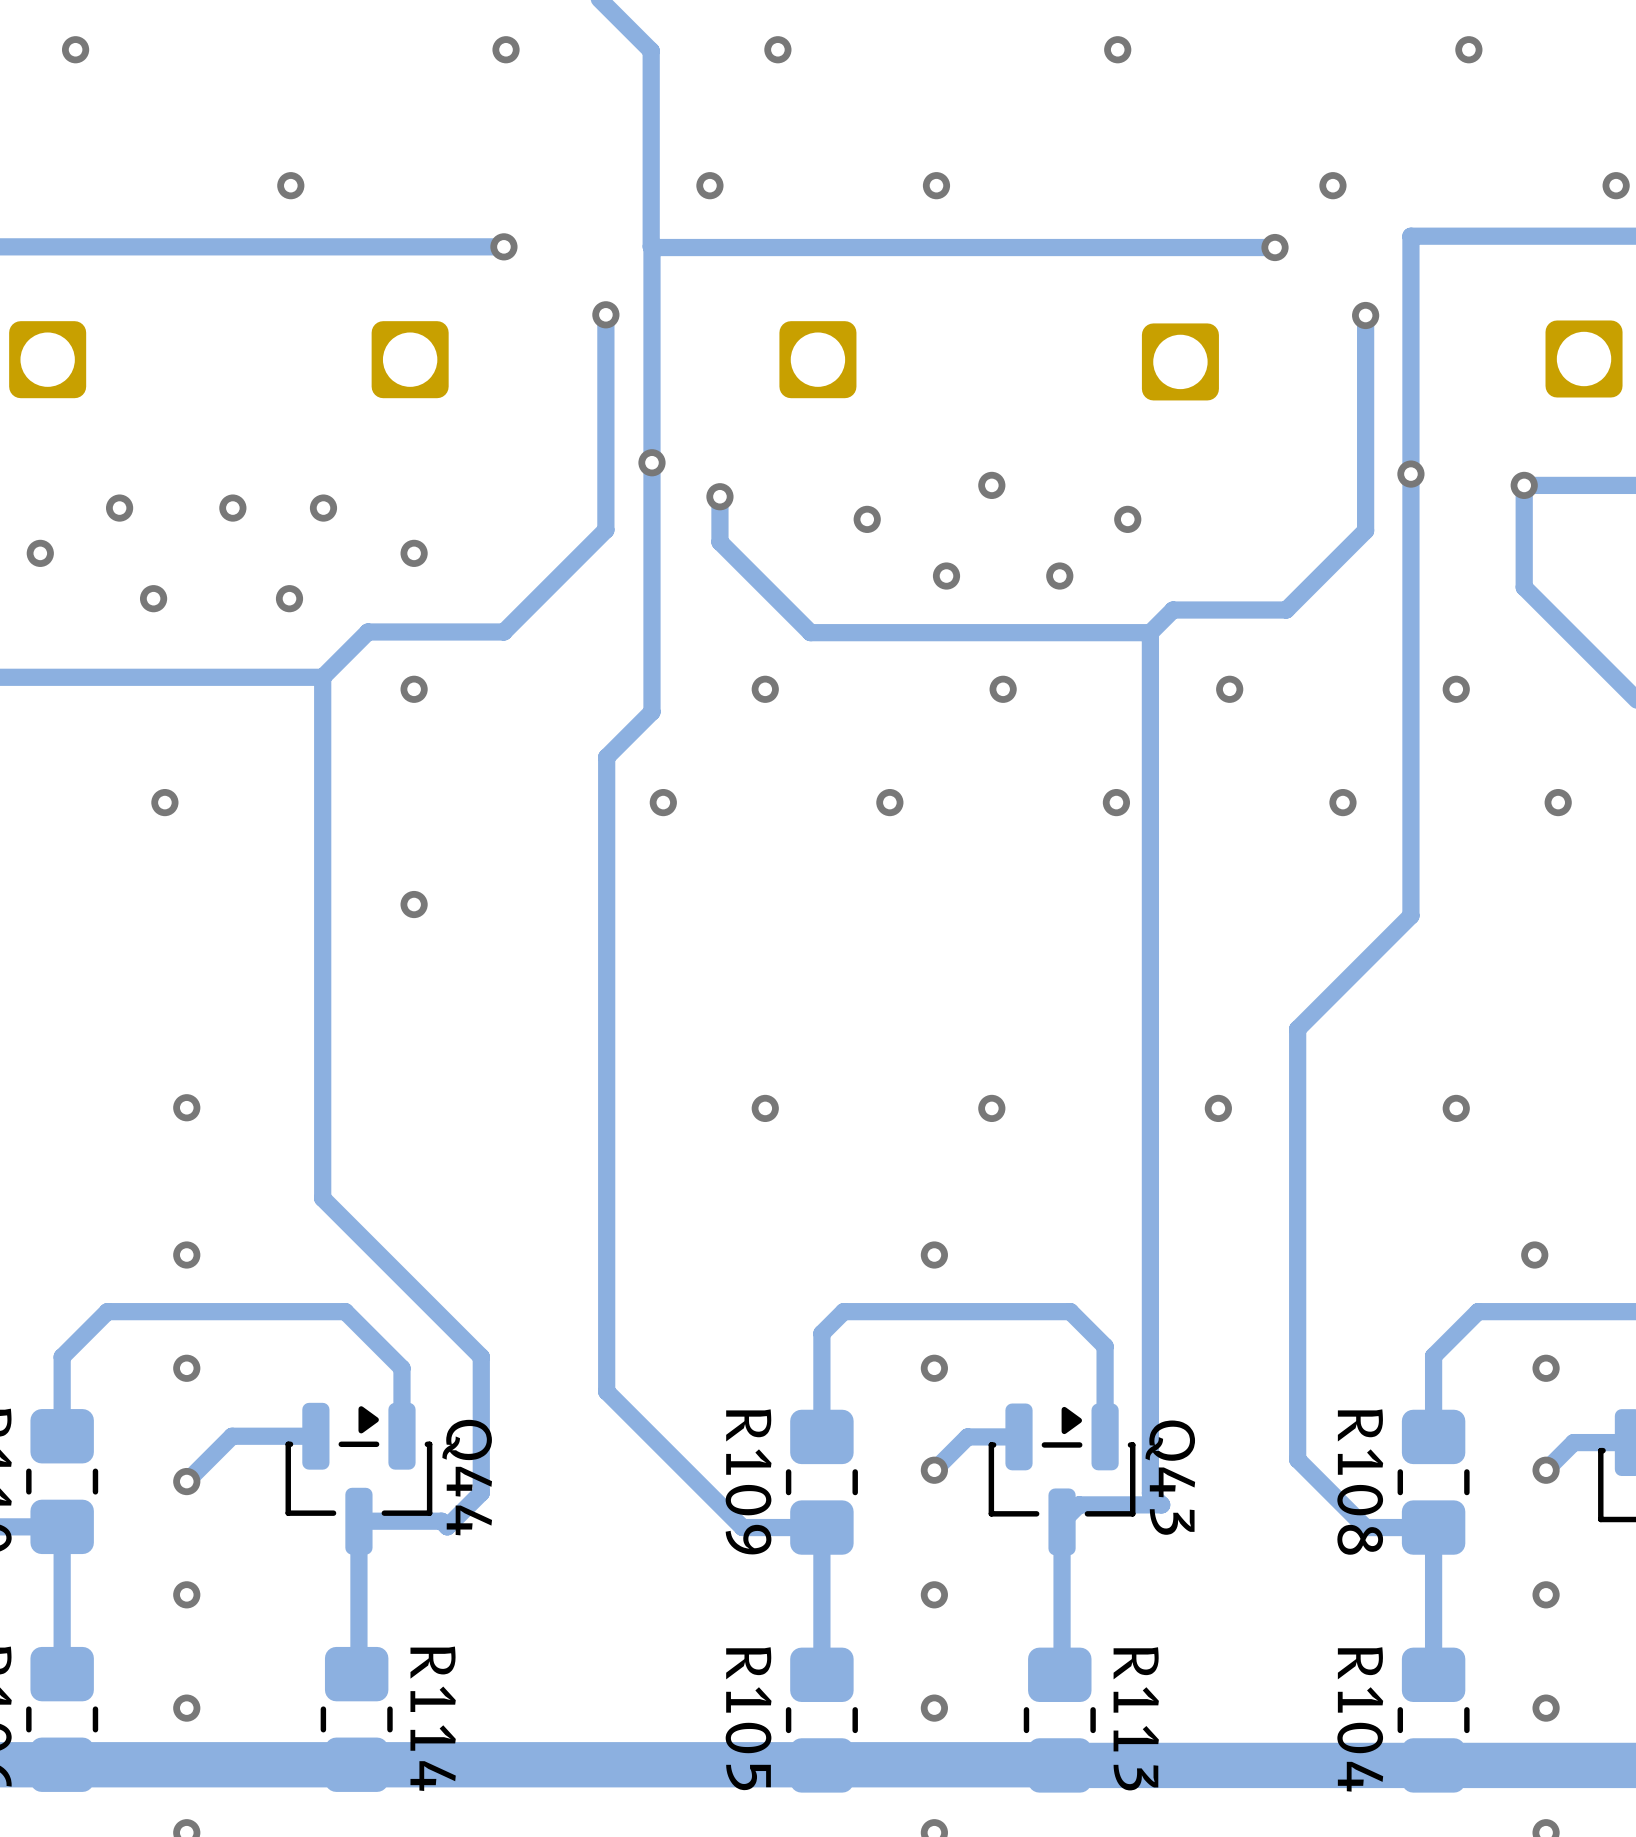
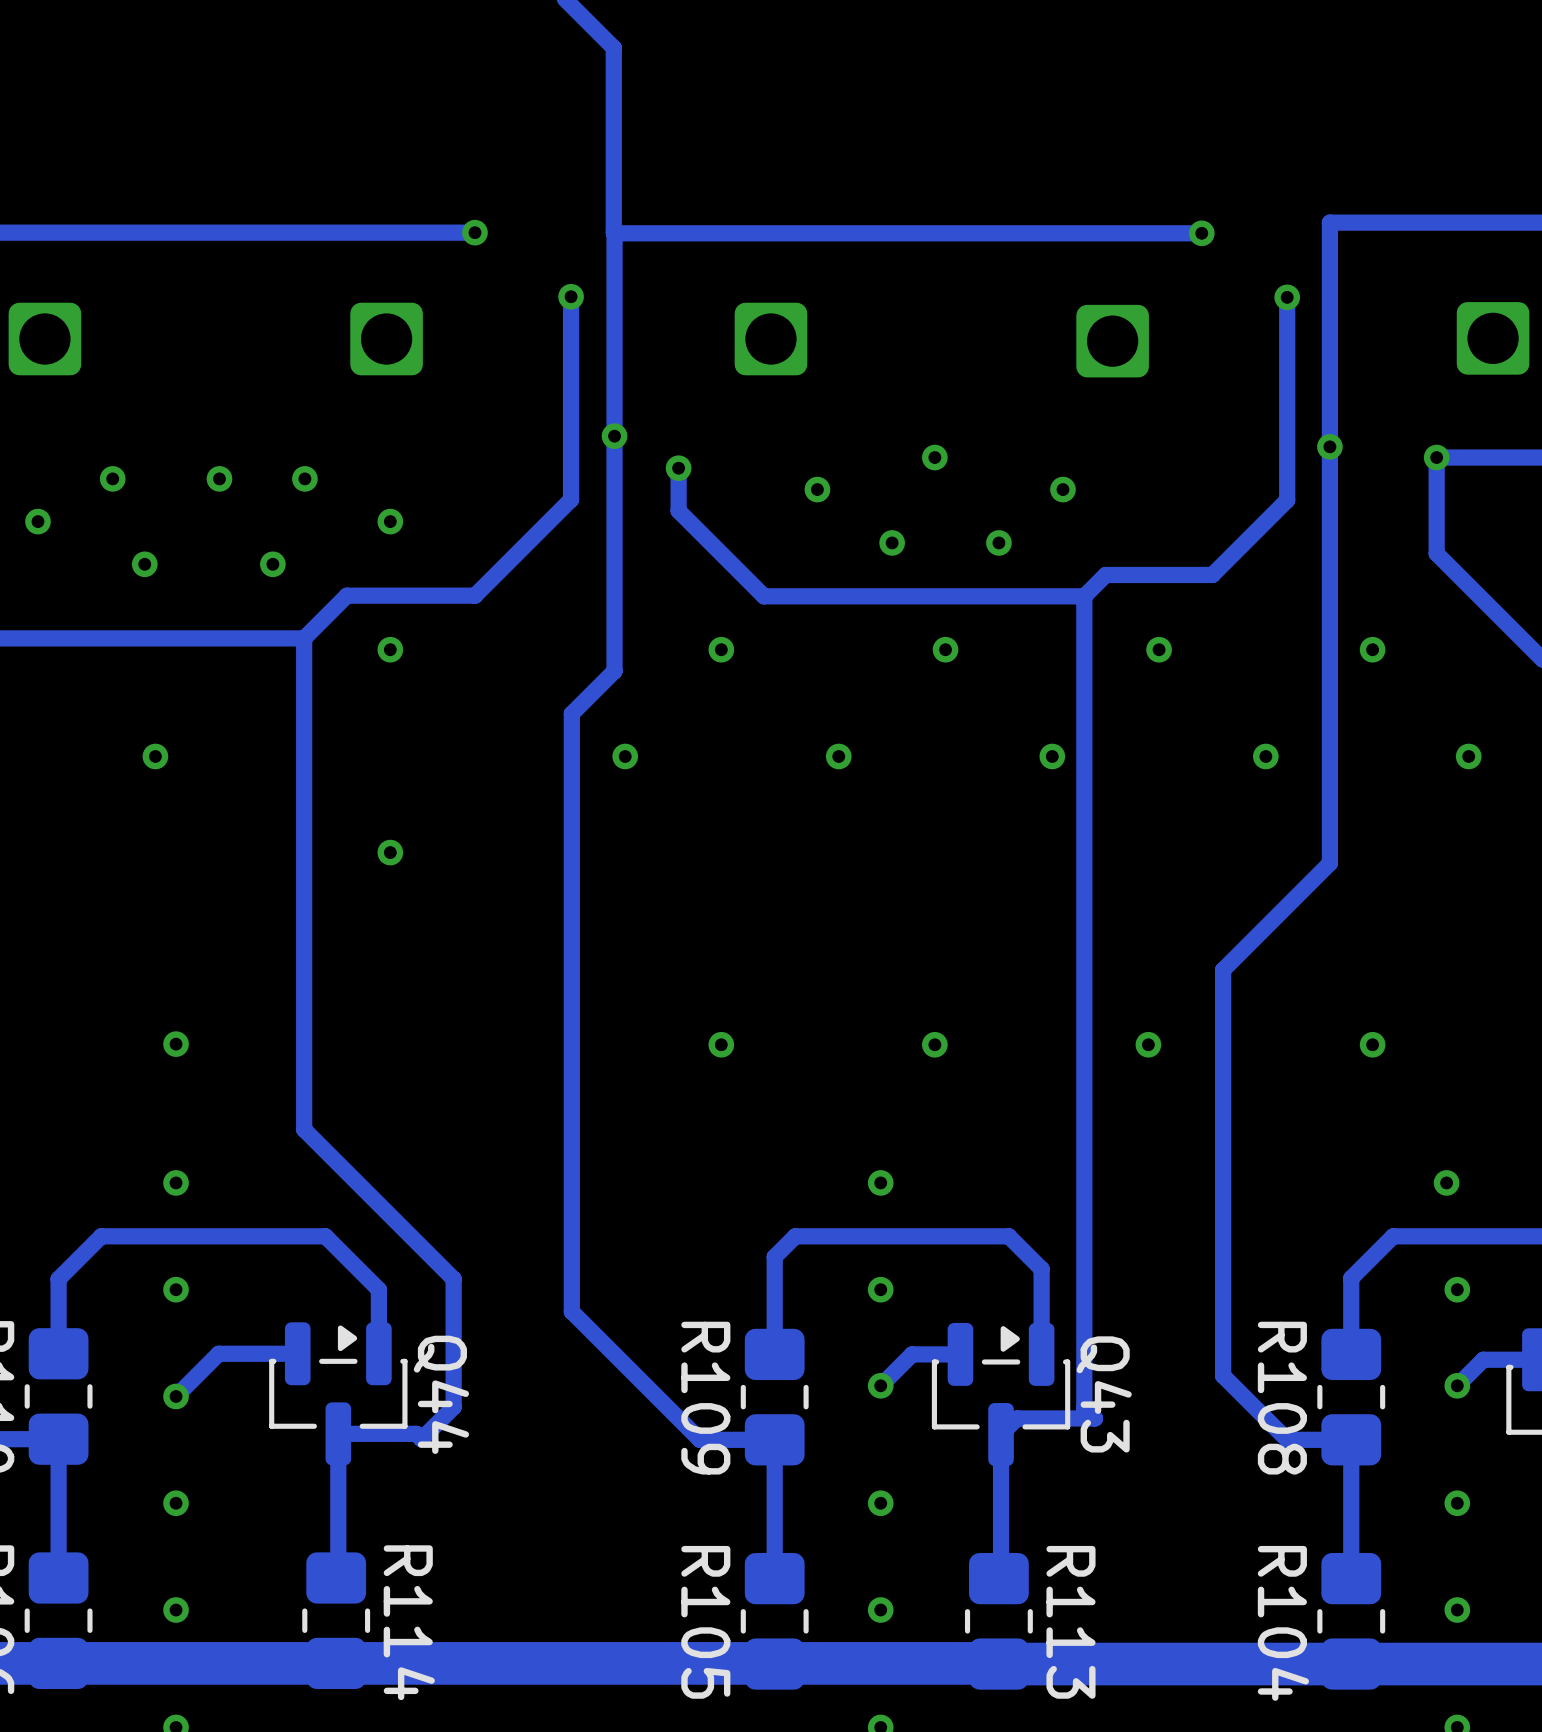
via: (75, 49) -> none
via: (506, 49) -> none
via: (777, 49) -> none
via: (1117, 49) -> none
via: (1468, 49) -> none
via: (290, 185) -> none
via: (709, 185) -> none
via: (936, 185) -> none
via: (1332, 185) -> none
via: (1616, 185) -> none

